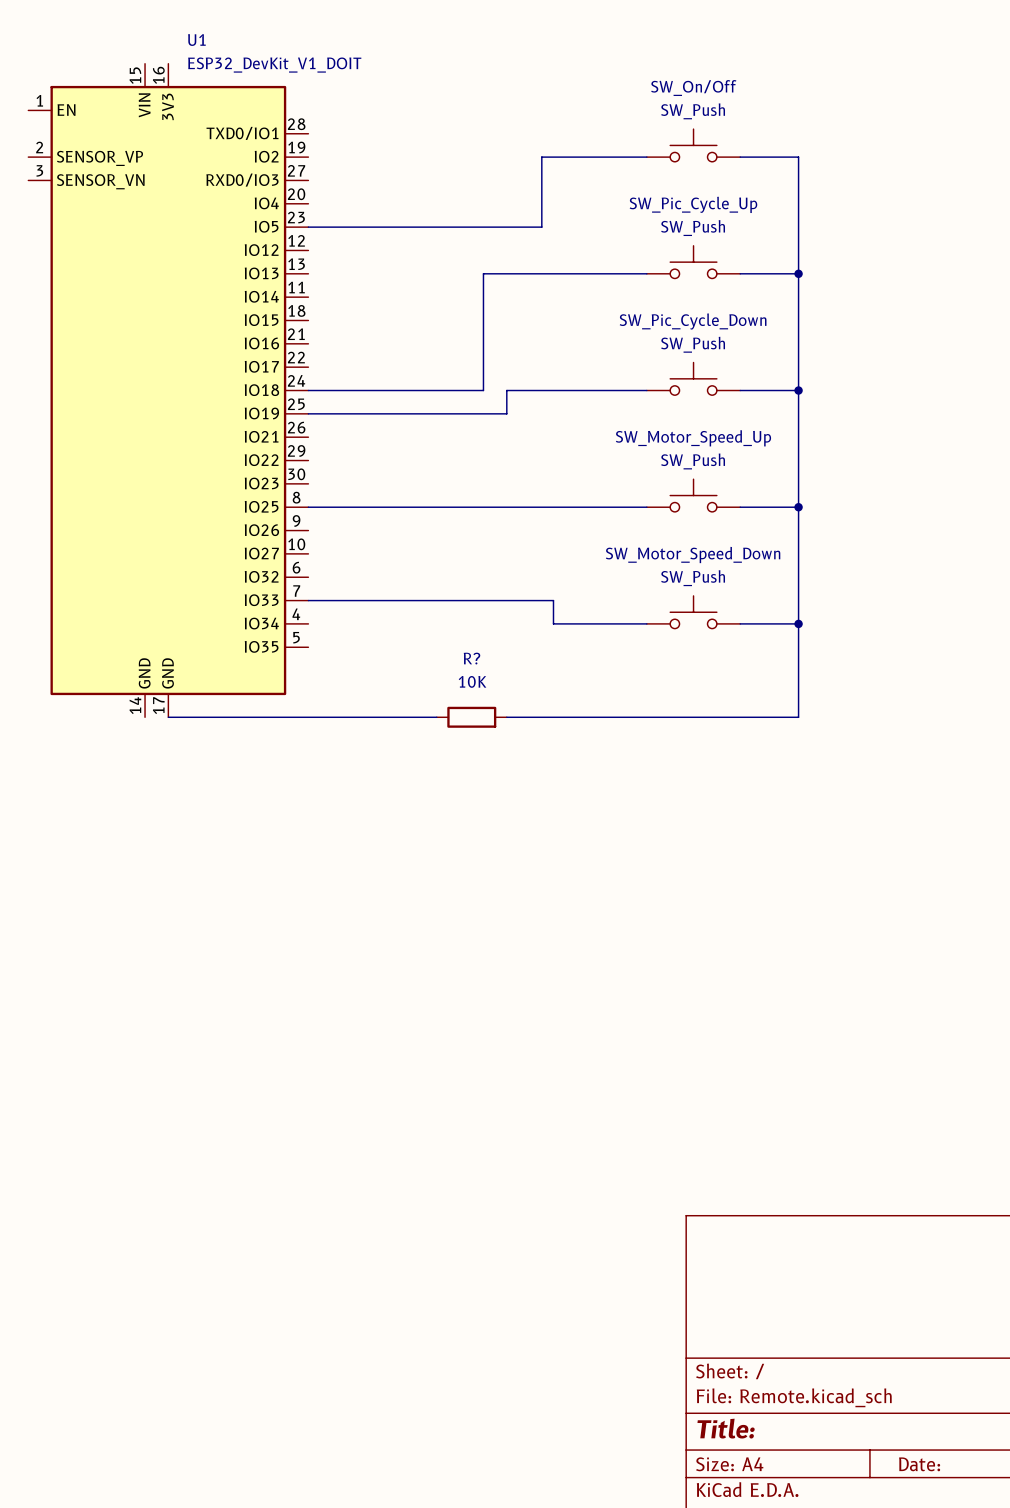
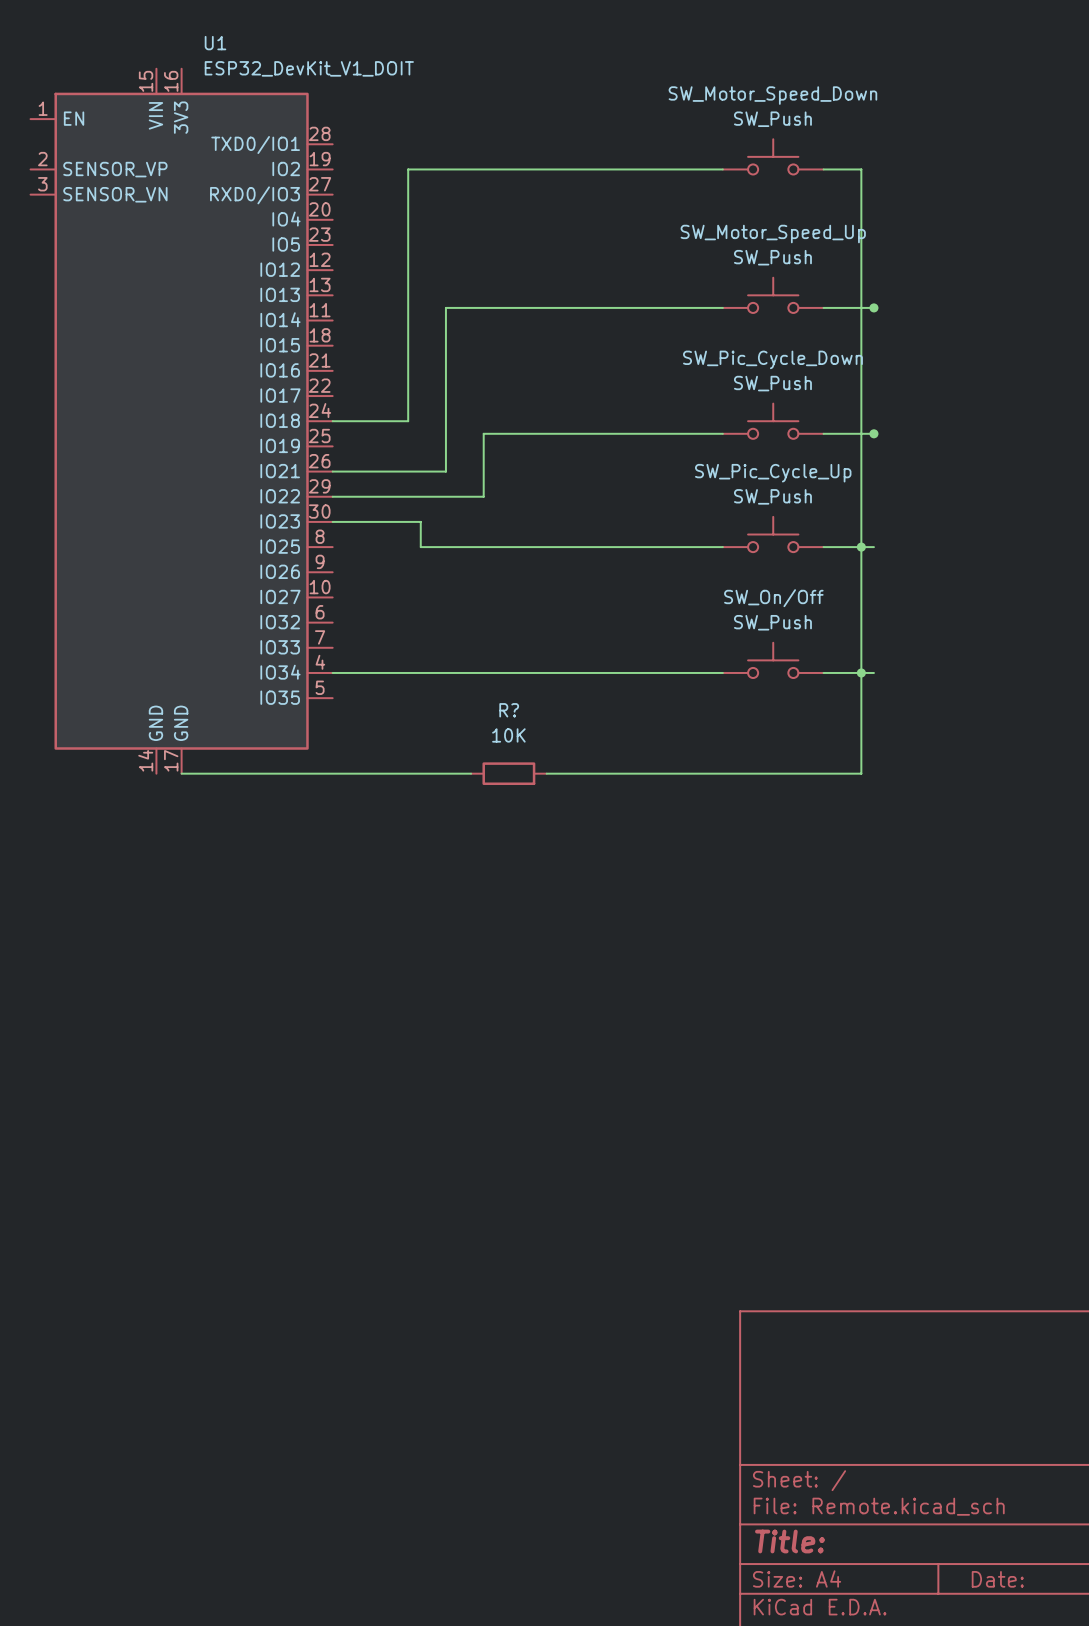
SW_On/Off: SW_Push (693, 145) -> none
SW_Motor_Speed_Down: none -> SW_Push (773, 156)
wire: (541, 157) (541, 227) (308, 227) -> none
SW_Pic_Cycle_Up: SW_Push (693, 262) -> none
wire: (646, 273) (483, 273) (483, 390) (378, 390) -> (584, 169) (408, 169) (408, 421)
wire: (740, 273) (798, 273) -> none
junction position: (798, 273) -> (873, 307)
wire: none -> (722, 307) (445, 307) (445, 471) (332, 471)
wire: none -> (823, 307) (873, 307)
SW_Pic_Cycle_Down position: (693, 378) -> (773, 421)
wire: (646, 390) (506, 390) (506, 413) (308, 413) -> none
wire: (740, 390) (798, 390) -> none
junction position: (798, 390) -> (873, 433)
wire: none -> (722, 433) (483, 433) (483, 496) (332, 496)
wire: none -> (823, 433) (873, 433)
SW_Motor_Speed_Up position: (693, 495) -> (773, 295)
SW_Pic_Cycle_Up: none -> SW_Push (773, 534)
wire: (308, 507) (390, 507) -> (332, 521) (420, 521) (420, 547)
wire: none -> (861, 547) (873, 547)
wire: (308, 600) (553, 600) (553, 623) -> (332, 672) (597, 672)
SW_Motor_Speed_Down: SW_Push (693, 612) -> none
SW_On/Off: none -> SW_Push (773, 660)
wire: none -> (861, 672) (873, 672)

